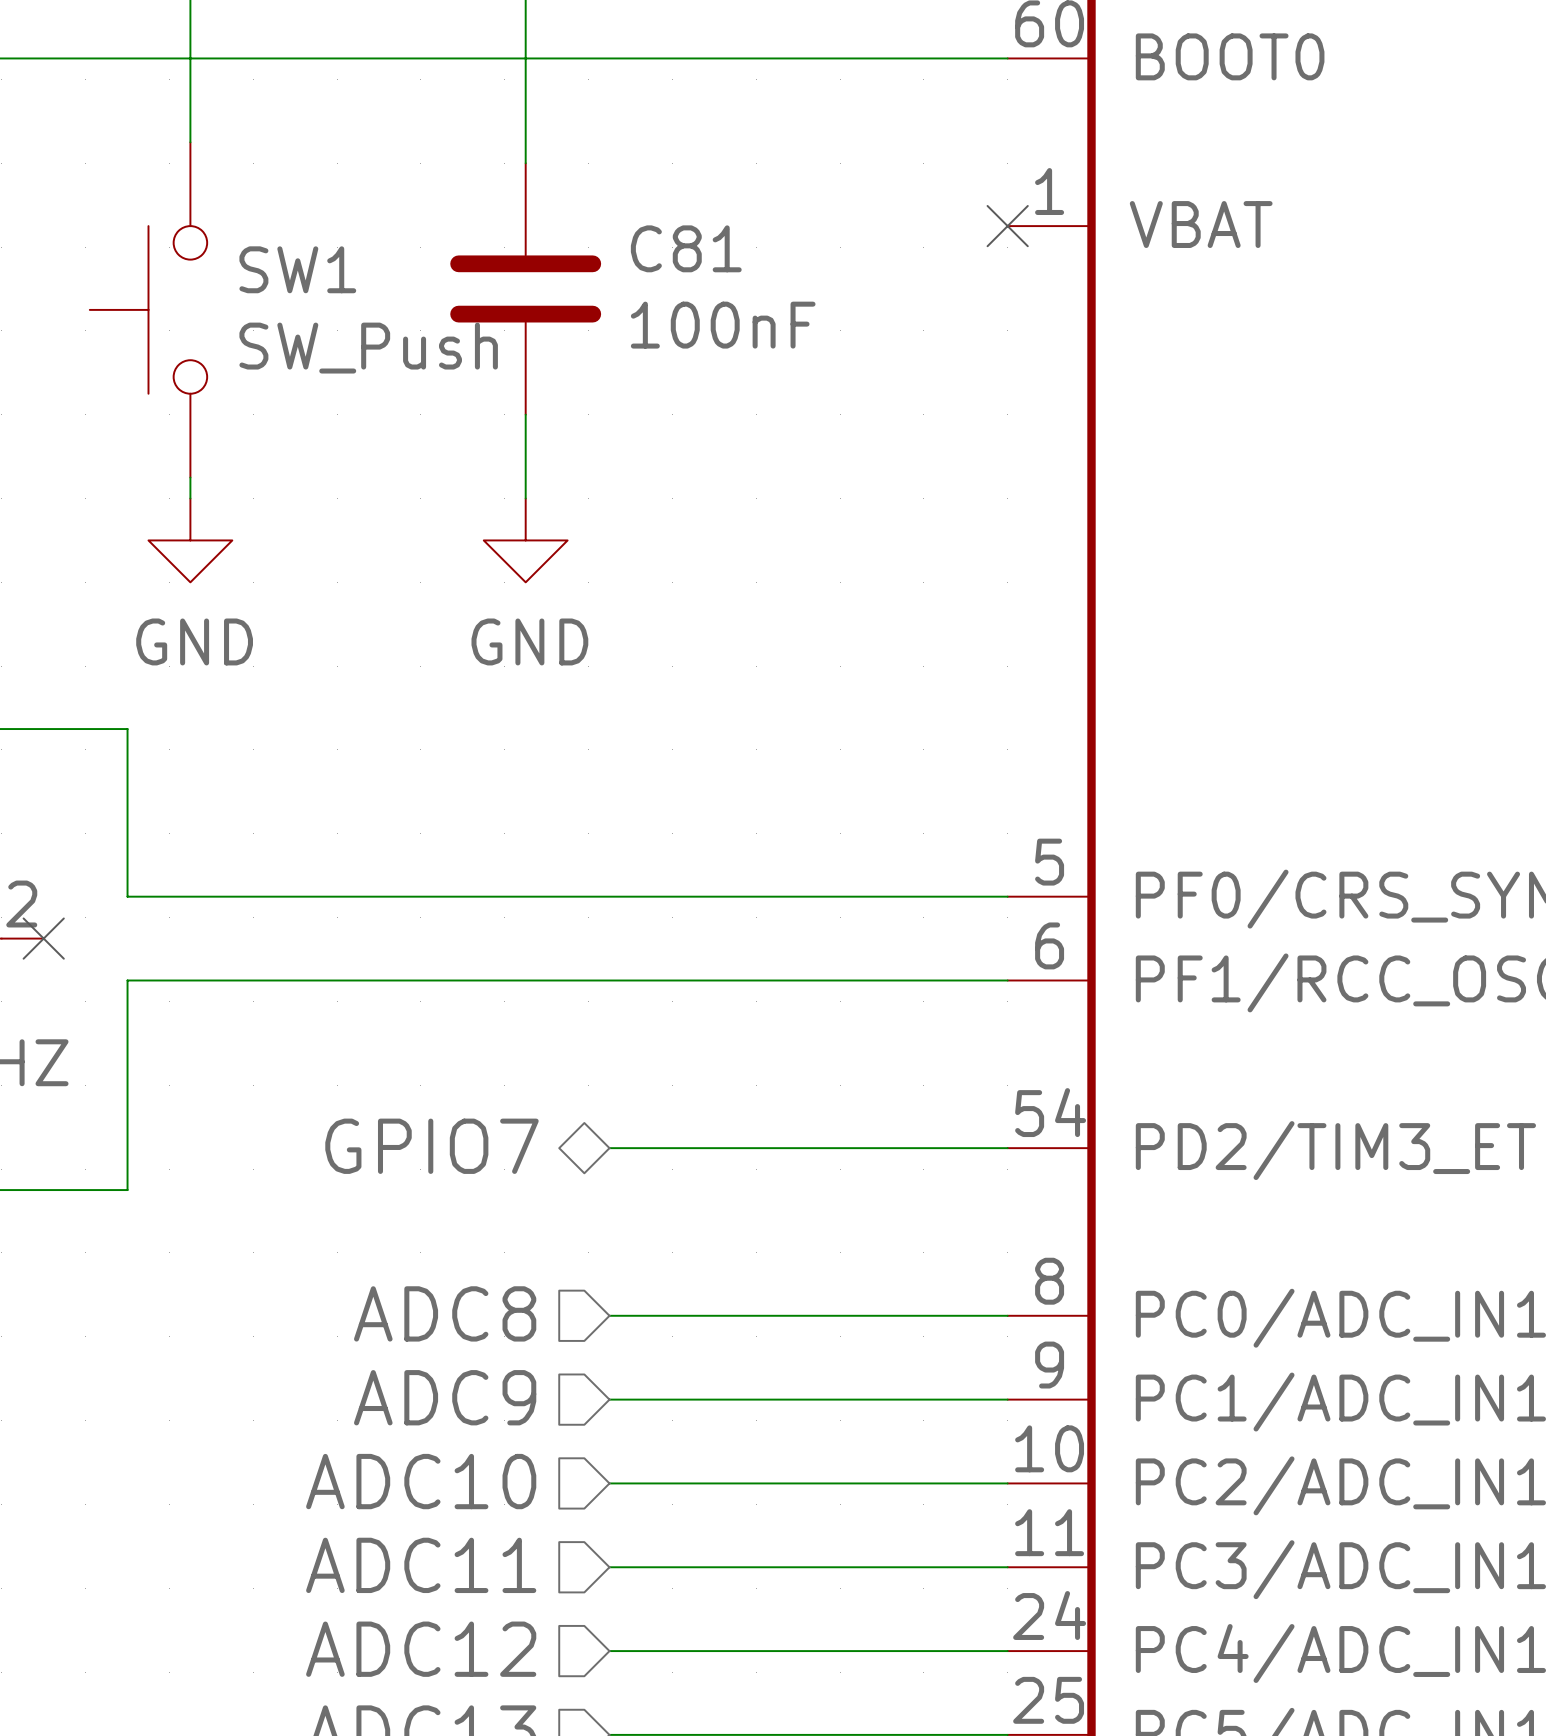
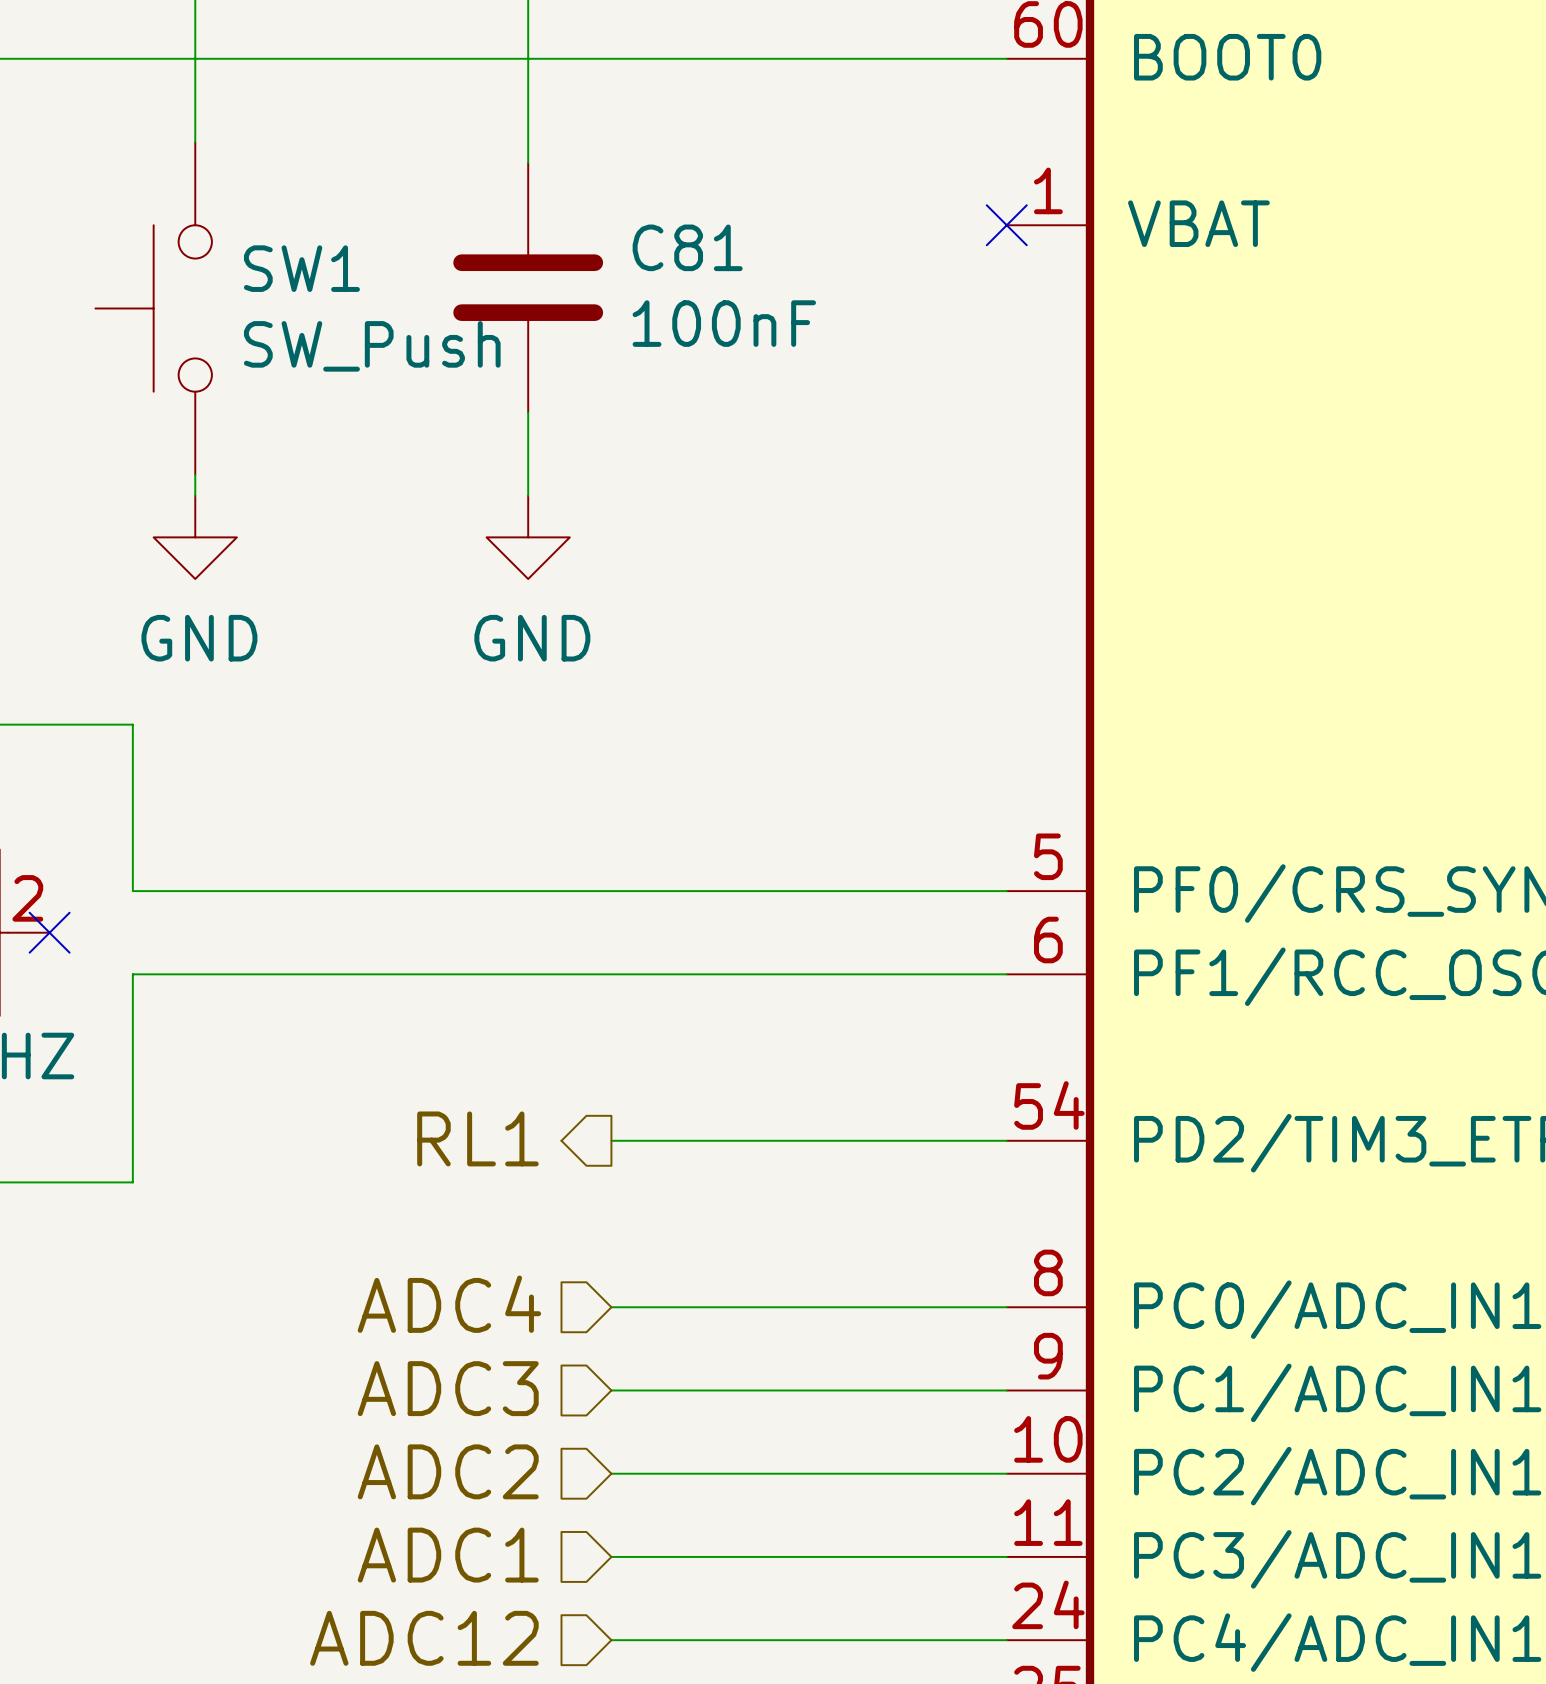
hierarchical label shape: bidirectional (431, 1146) -> output (477, 1138)
hierarchical label: GPIO7 (431, 1146) -> RL1 (477, 1138)
hierarchical label: ADC8 (445, 1313) -> ADC4 (449, 1304)
hierarchical label: ADC9 (445, 1397) -> ADC3 (448, 1388)
hierarchical label: ADC10 (421, 1481) -> ADC2 (448, 1471)
hierarchical label: ADC11 (421, 1565) -> ADC1 (448, 1555)

